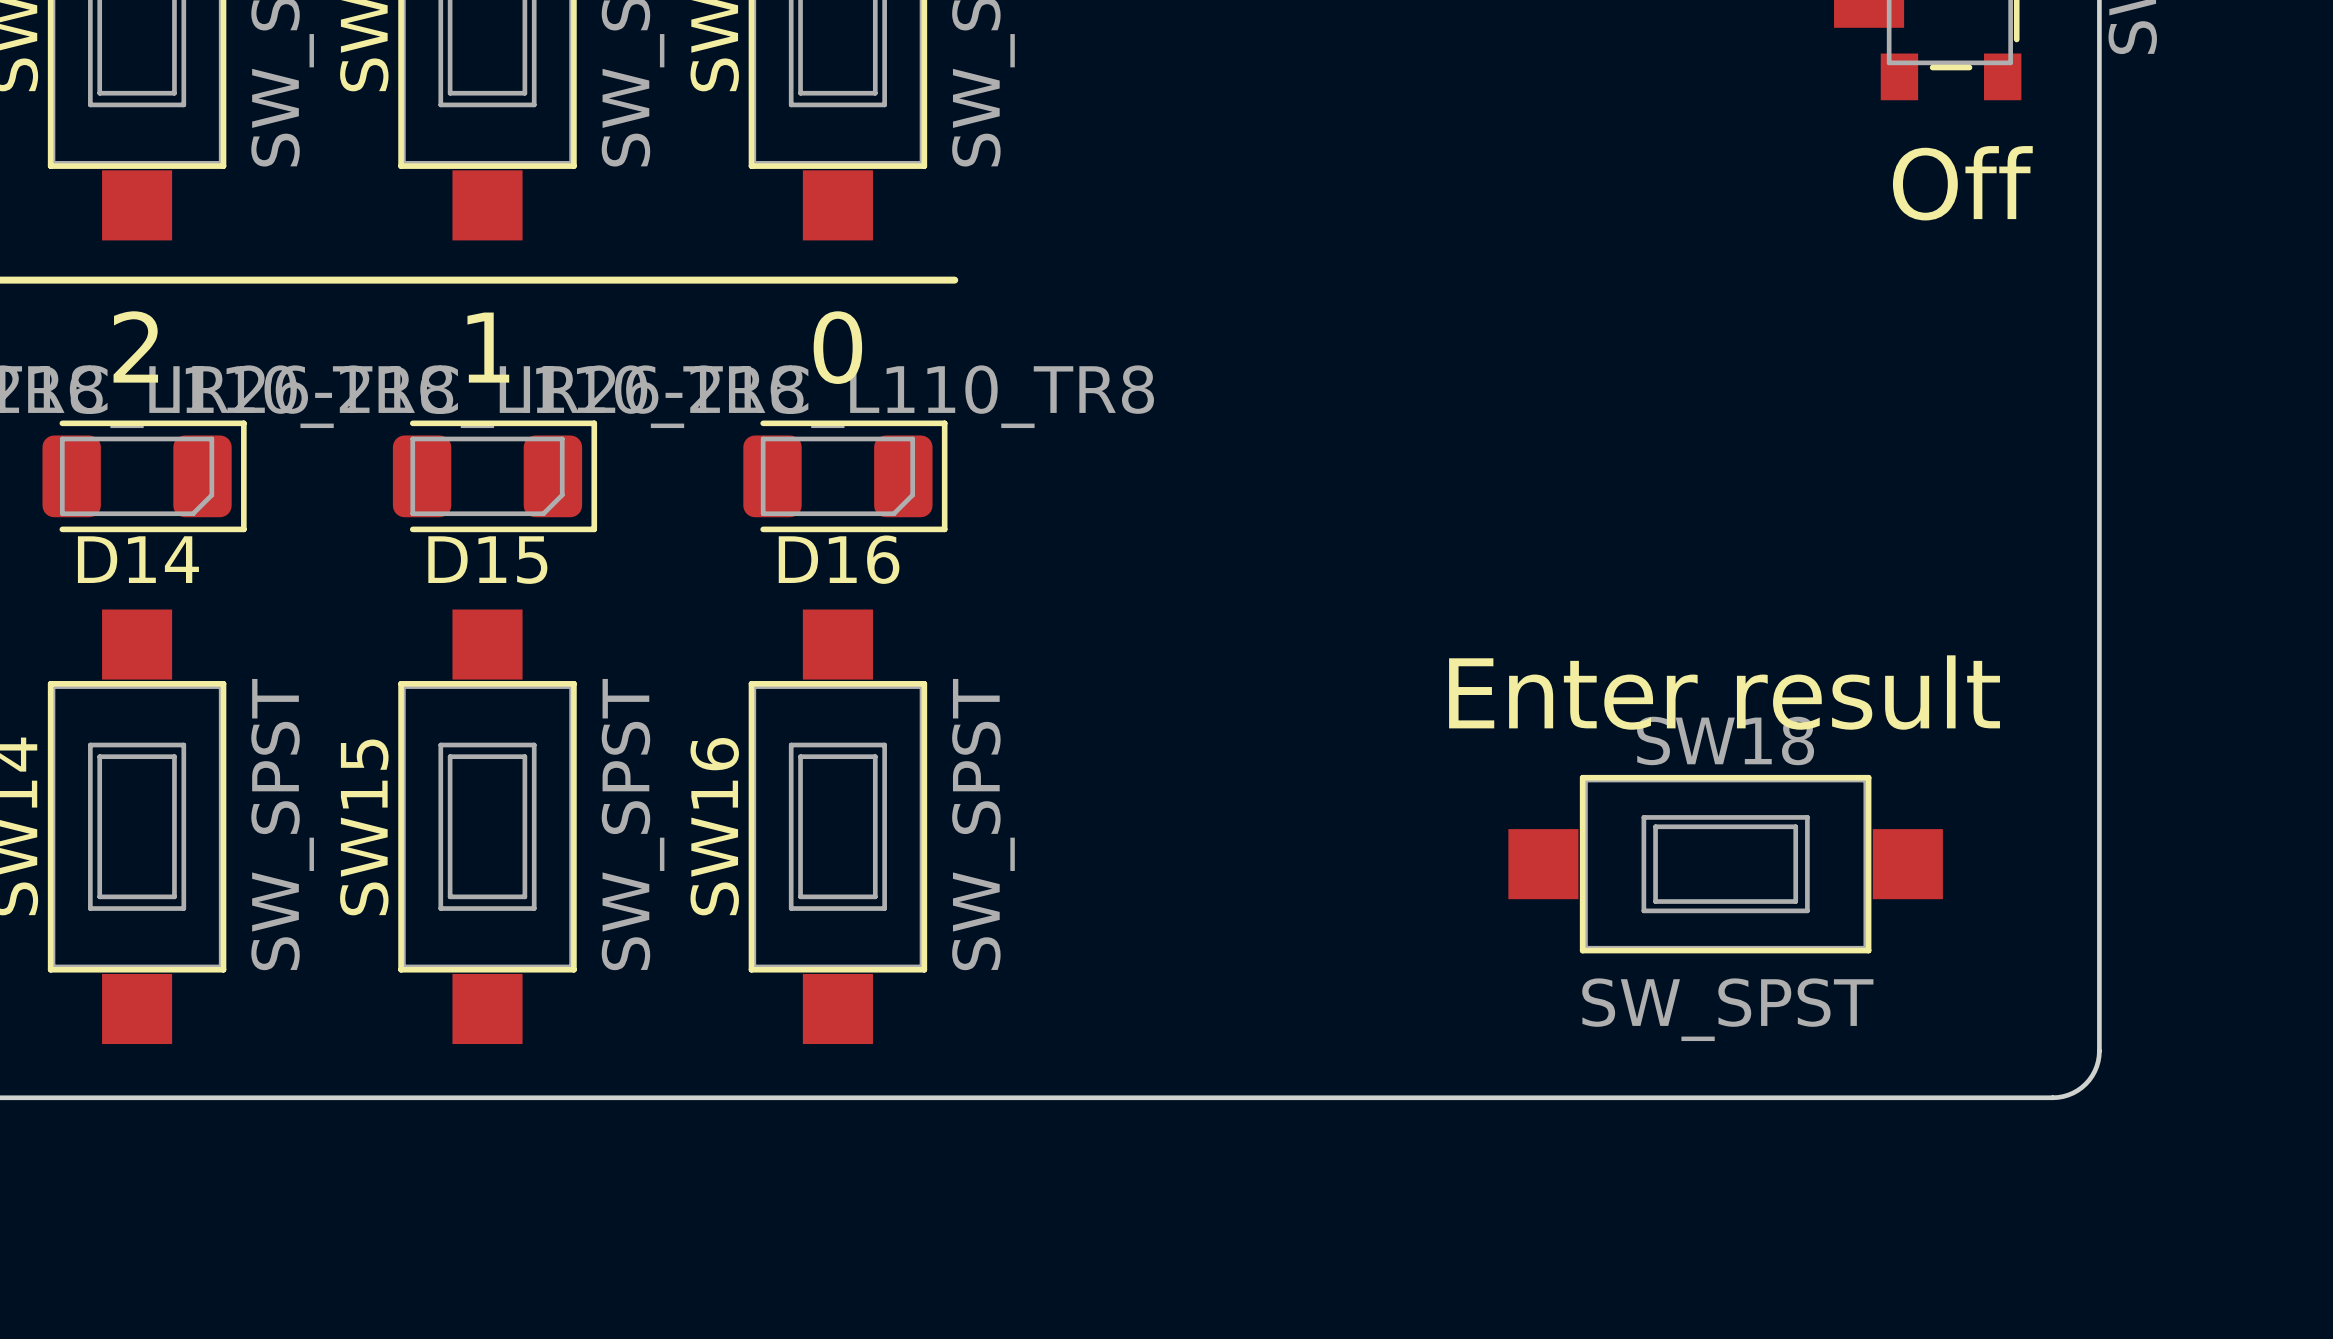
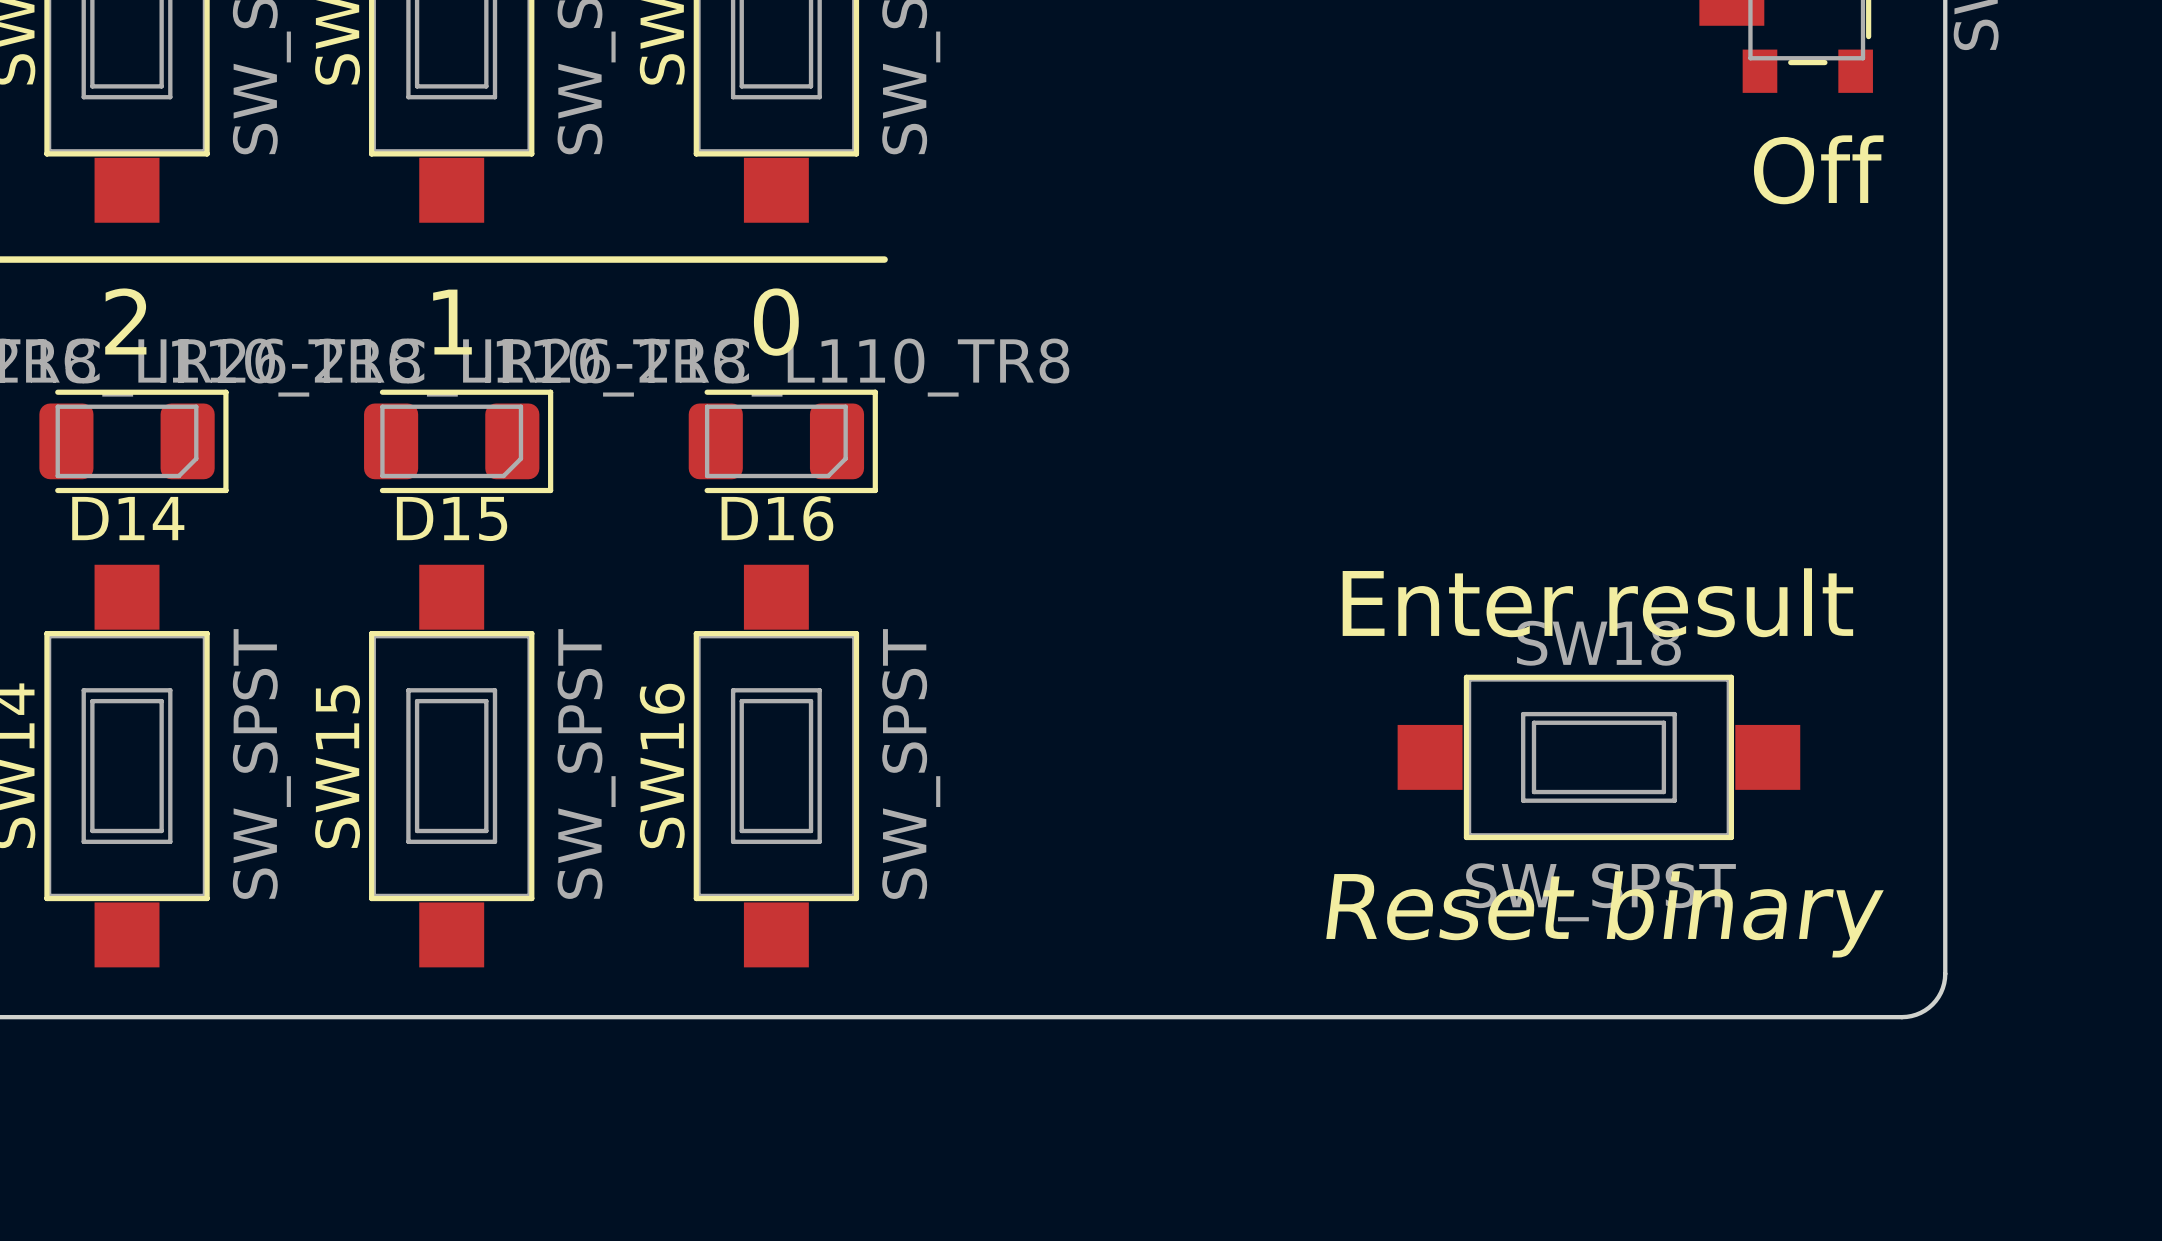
text position: Enter result (1724, 692) -> Enter result (1597, 602)
SW18 position: (1725, 864) -> (1598, 757)
text: none -> Reset binary (1605, 914)

